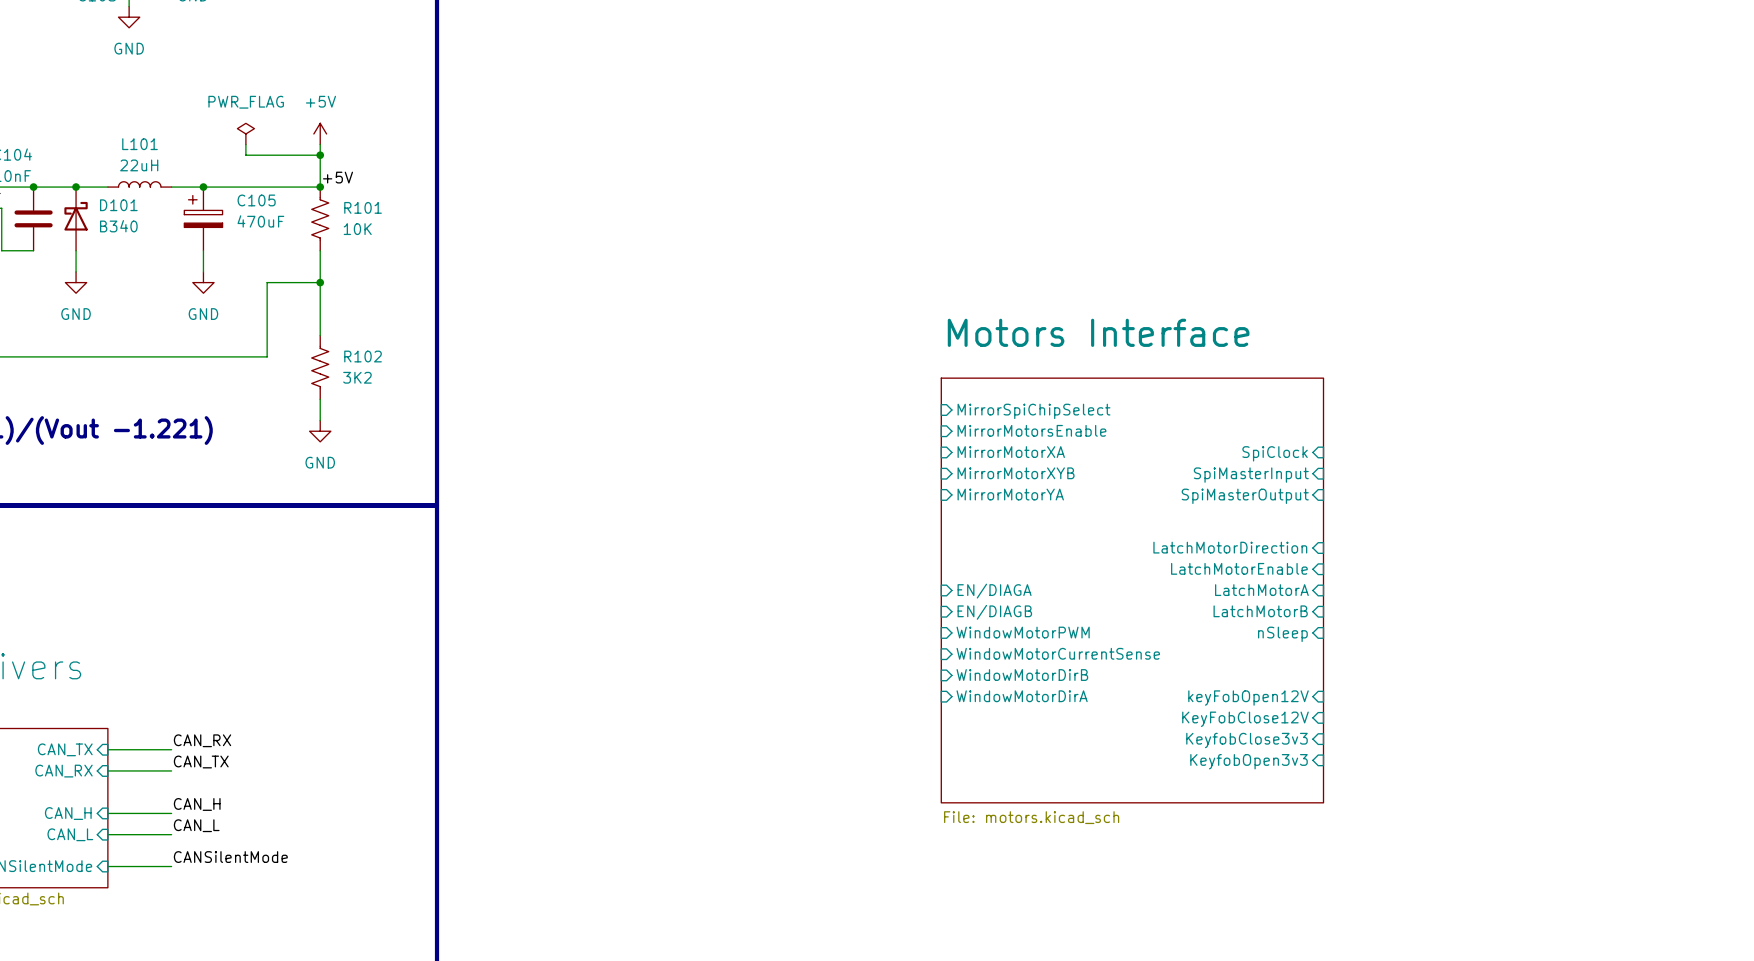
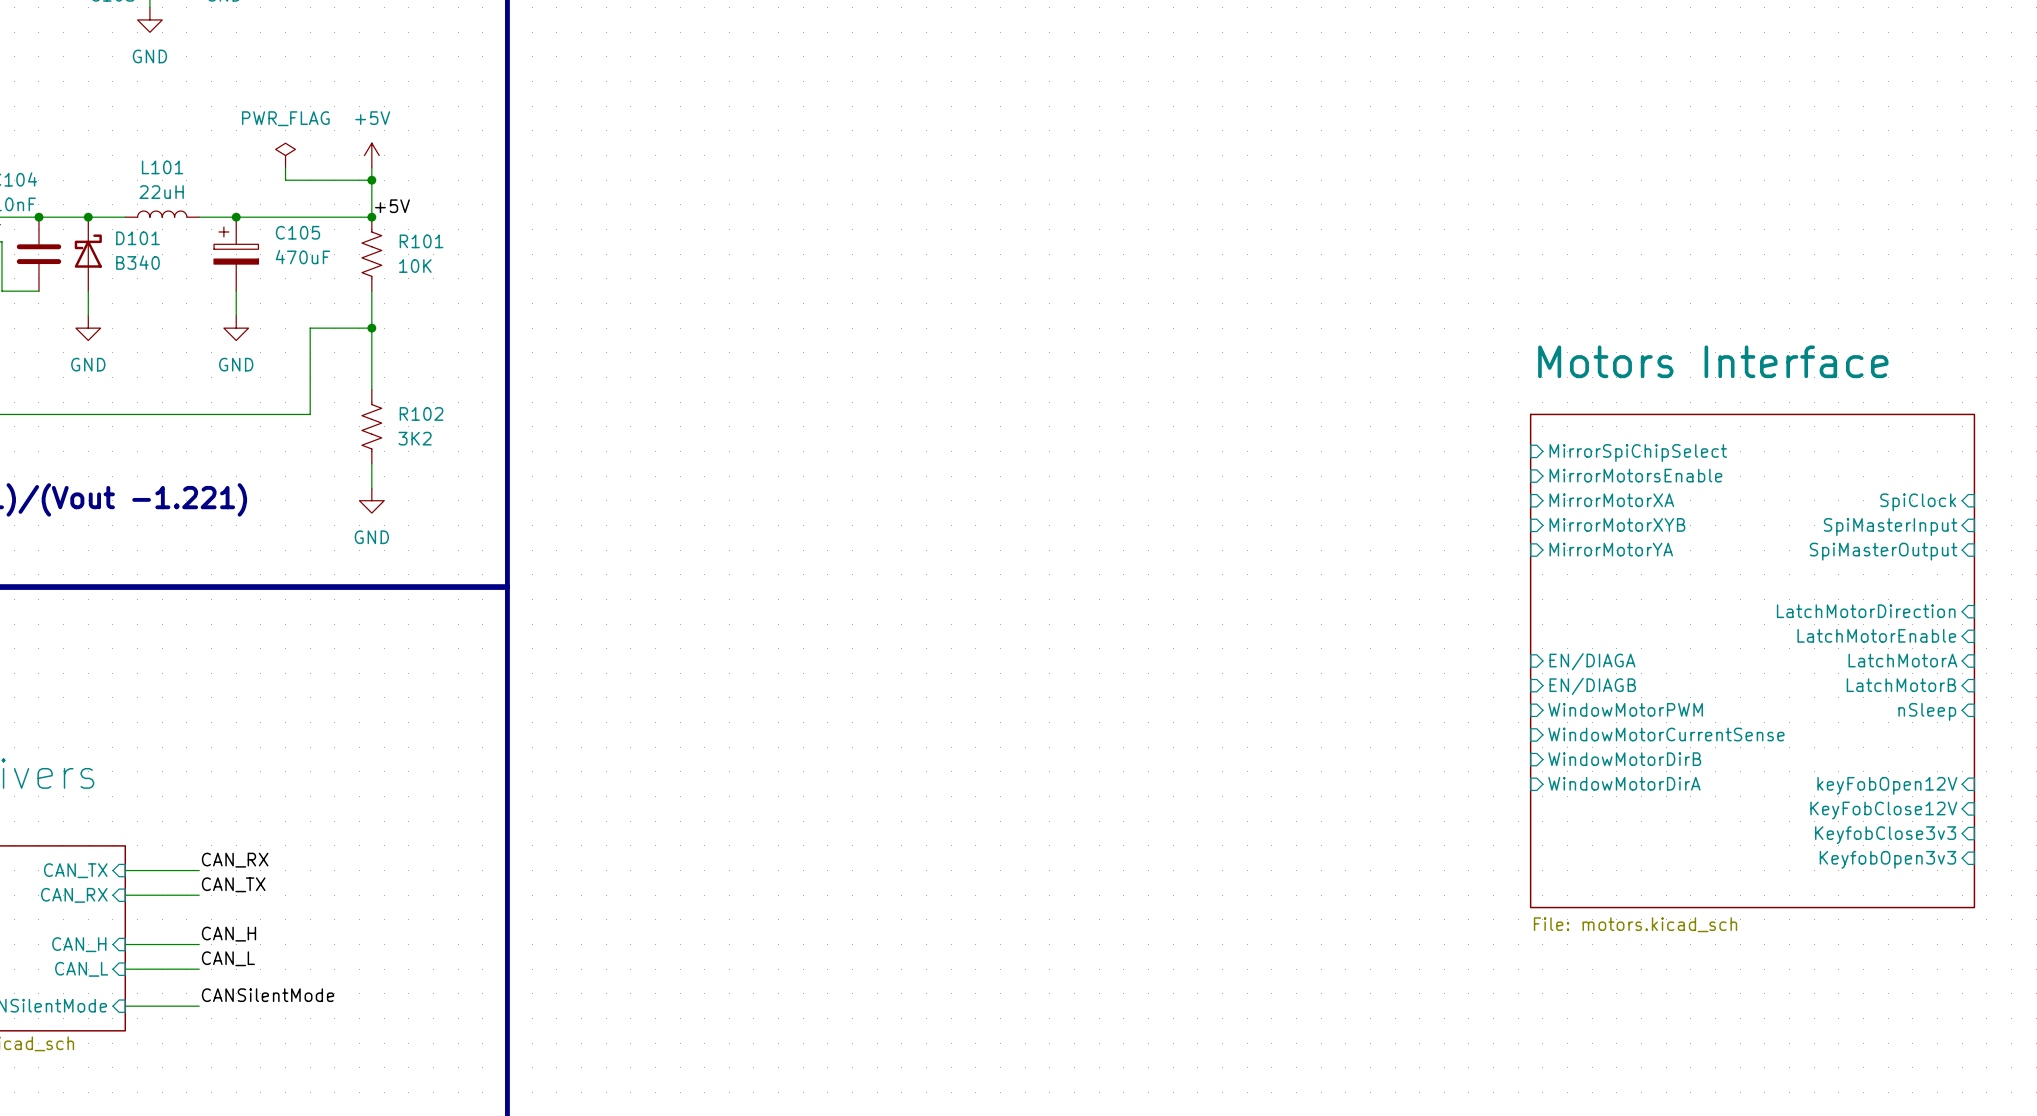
sheet pin: none -> MirrorSpiChipSelect (1638, 453)
sheet pin: none -> MirrorMotorsEnable (1635, 475)
sheet pin: MirrorSpiChipSelect (1033, 411) -> none
sheet pin: MirrorMotorsEnable (1031, 430) -> none
sheet pin: none -> MirrorMotorXA (1611, 500)
sheet pin: none -> SpiClock (1918, 502)
sheet pin: MirrorMotorXA (1011, 452) -> none
sheet pin: none -> MirrorMotorXYB (1617, 524)
sheet pin: SpiClock (1275, 453) -> none
sheet pin: none -> SpiMasterInput (1890, 526)
sheet pin: MirrorMotorXYB (1016, 473) -> none
sheet pin: none -> MirrorMotorYA (1611, 549)
sheet pin: SpiMasterInput (1251, 475) -> none
sheet pin: none -> SpiMasterOutput (1883, 551)
sheet pin: MirrorMotorYA (1010, 494) -> none
sheet pin: SpiMasterOutput (1245, 496) -> none
sheet pin: none -> LatchMotorDirection (1866, 611)
sheet pin: LatchMotorDirection (1230, 547) -> none
sheet pin: none -> LatchMotorEnable (1876, 635)
sheet pin: LatchMotorEnable (1239, 568) -> none
sheet pin: none -> LatchMotorA (1902, 660)
sheet pin: none -> EN/DIAGA (1592, 661)
sheet Motors Interface: none -> File: motors.kicad_sch (1752, 660)
sheet Motors Interface: File: motors.kicad_sch (1132, 590) -> none
sheet pin: LatchMotorA (1261, 590) -> none
sheet pin: none -> LatchMotorB (1901, 685)
sheet pin: EN/DIAGA (994, 591) -> none
sheet pin: none -> EN/DIAGB (1592, 686)
sheet pin: LatchMotorB (1260, 611) -> none
sheet pin: none -> WindowMotorPWM (1625, 709)
sheet pin: EN/DIAGB (994, 612) -> none
sheet pin: none -> nSleep (1927, 711)
sheet pin: WindowMotorPWM (1023, 632) -> none
sheet pin: none -> WindowMotorCurrentSense (1666, 734)
sheet pin: nSleep (1282, 634) -> none
sheet pin: WindowMotorCurrentSense (1058, 653) -> none
sheet pin: none -> WindowMotorDirB (1624, 759)
sheet pin: WindowMotorDirB (1022, 675) -> none
sheet pin: none -> WindowMotorDirA (1624, 783)
sheet pin: none -> keyFobOpen12V (1887, 785)
sheet pin: WindowMotorDirA (1022, 696) -> none
sheet pin: keyFobOpen12V (1248, 698) -> none
sheet pin: none -> KeyFobClose12V (1883, 810)
sheet pin: KeyFobClose12V (1245, 719) -> none
sheet pin: none -> KeyfobClose3v3 (1885, 835)
sheet pin: KeyfobClose3v3 (1247, 740) -> none
sheet pin: none -> KeyfobOpen3v3 (1887, 859)
sheet pin: KeyfobOpen3v3 (1249, 761) -> none

